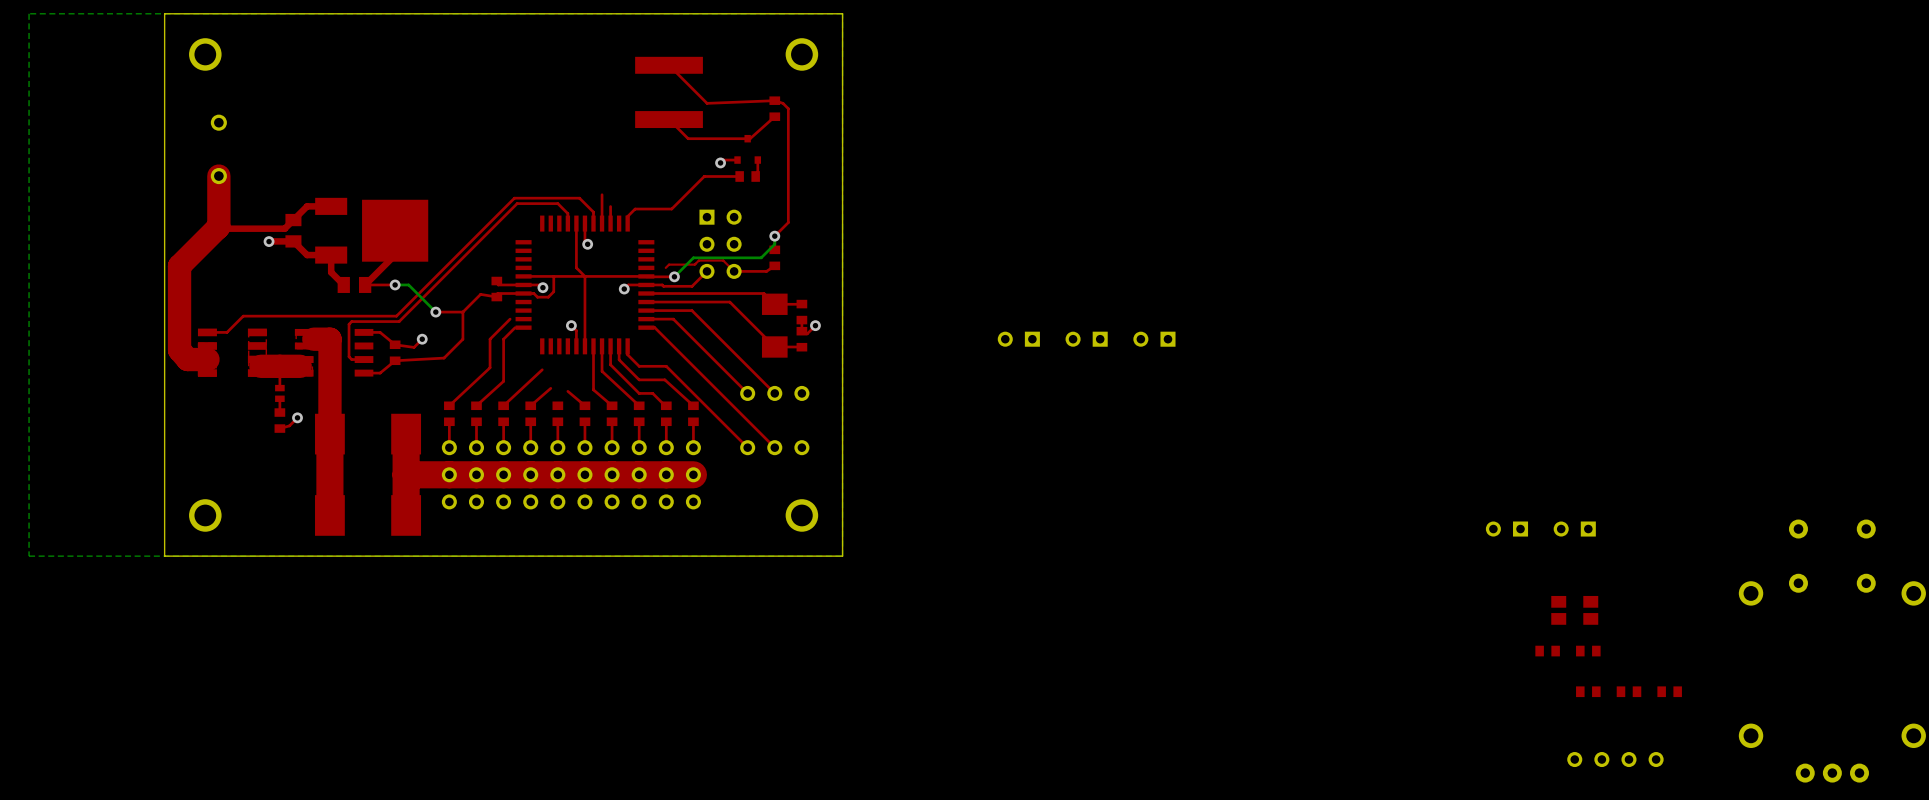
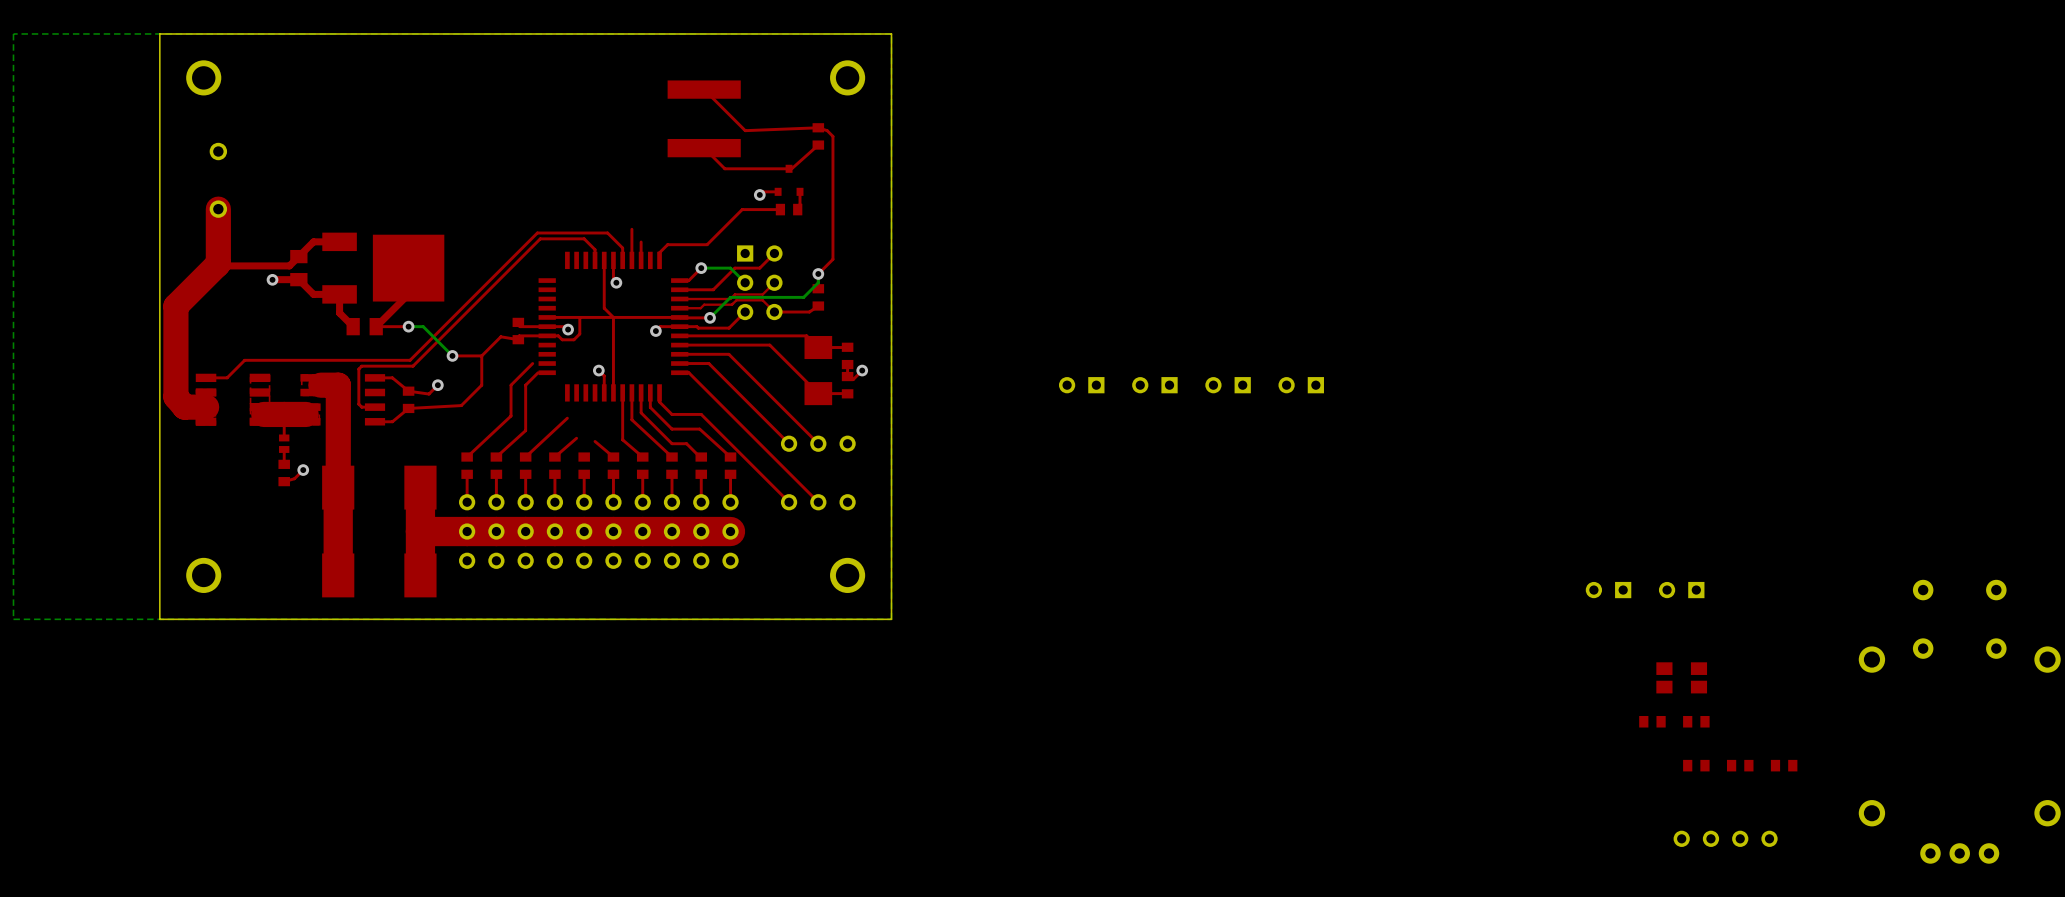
top track: none -> (774, 253) (759, 268) (734, 268) (713, 289) (679, 289)
top track: none -> (701, 268) (688, 280) (679, 280)
bottom track: none -> (701, 268) (730, 268) (745, 282)
via: none -> (701, 268)
top track: none -> (774, 282) (762, 294) (734, 294) (730, 299) (679, 299)
top track: none -> (700, 308) (679, 308)
part: none -> (1301, 385)

